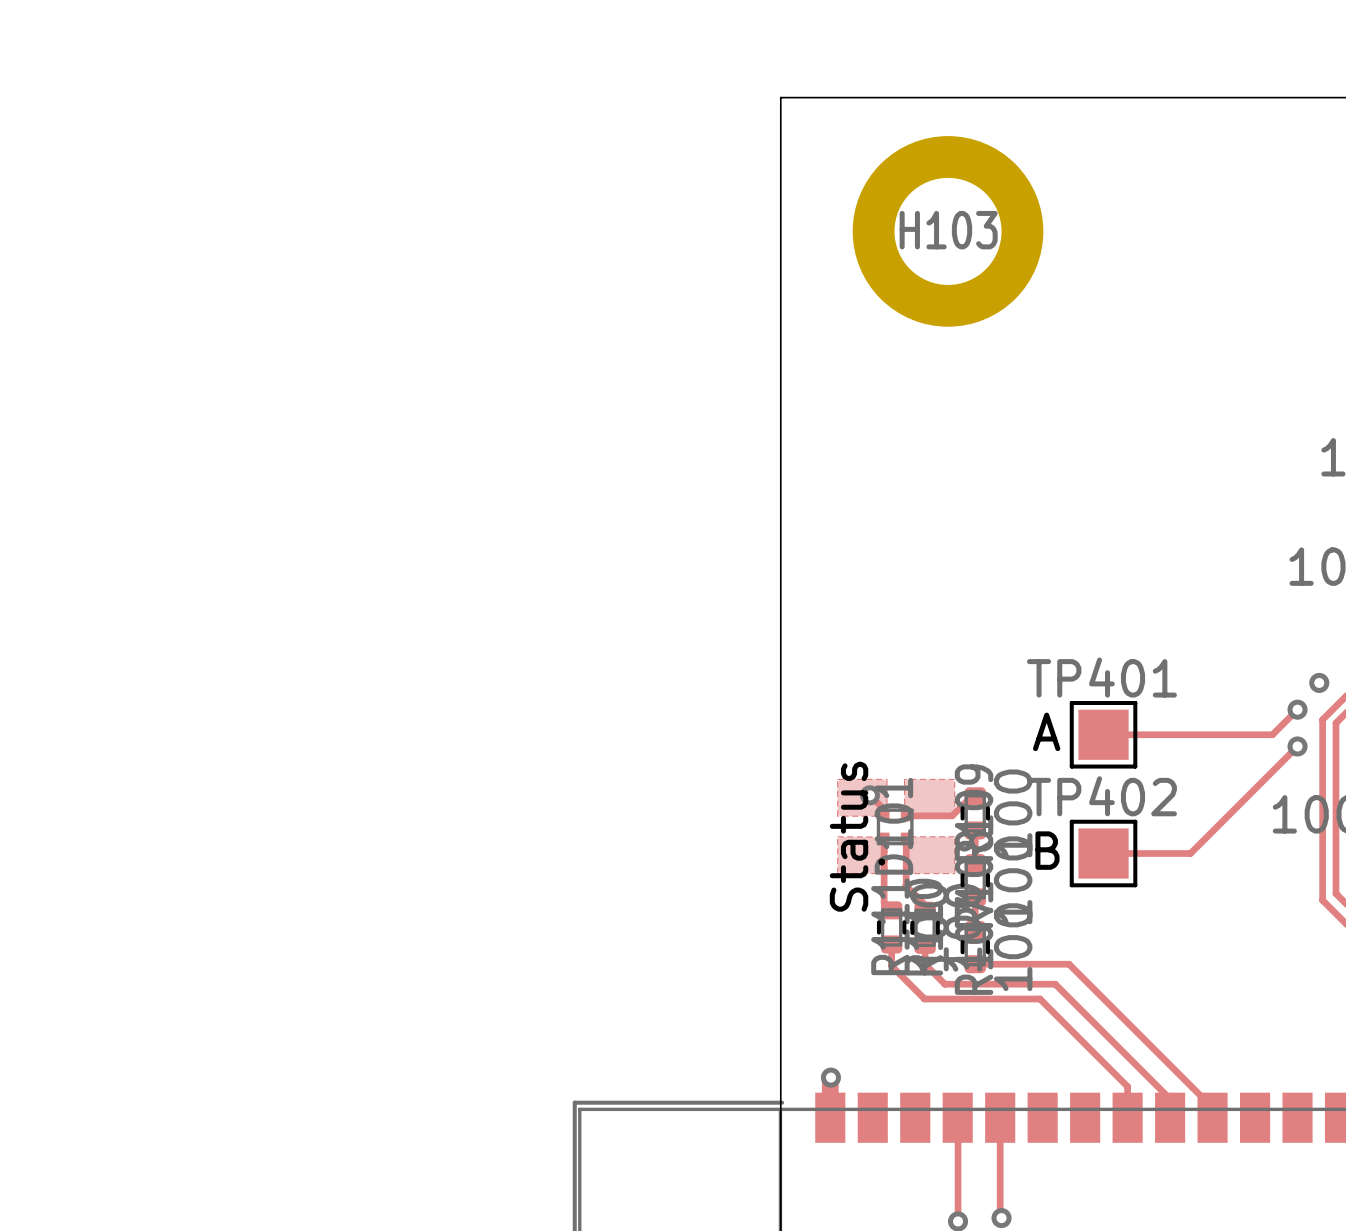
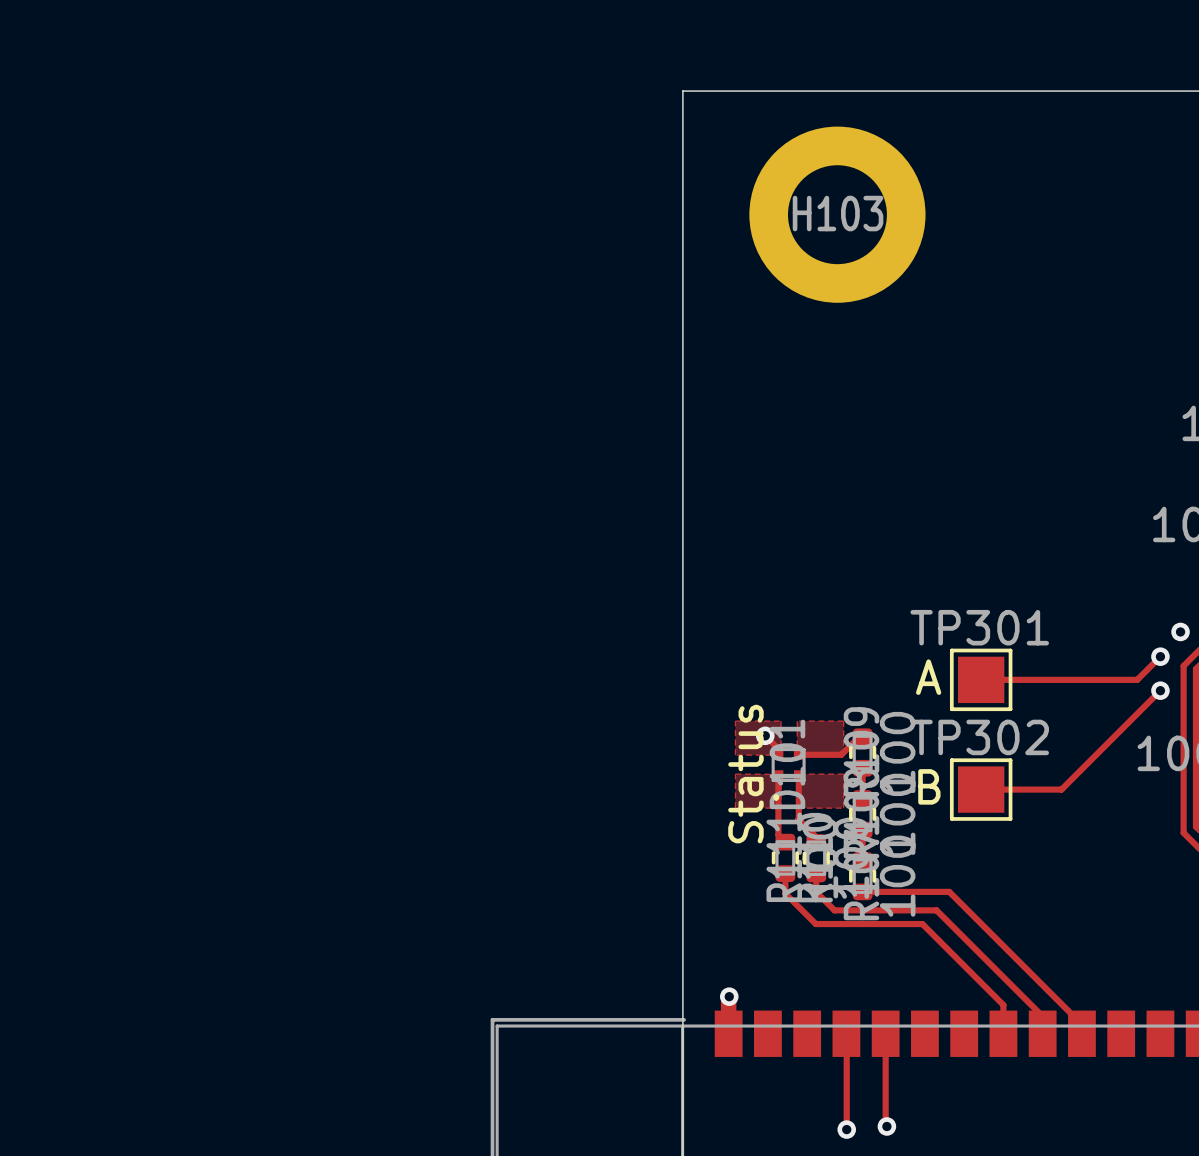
TP401 name: TP401 (1101, 677) -> TP301 (979, 627)
TP402 name: TP402 (1101, 796) -> TP302 (979, 737)

